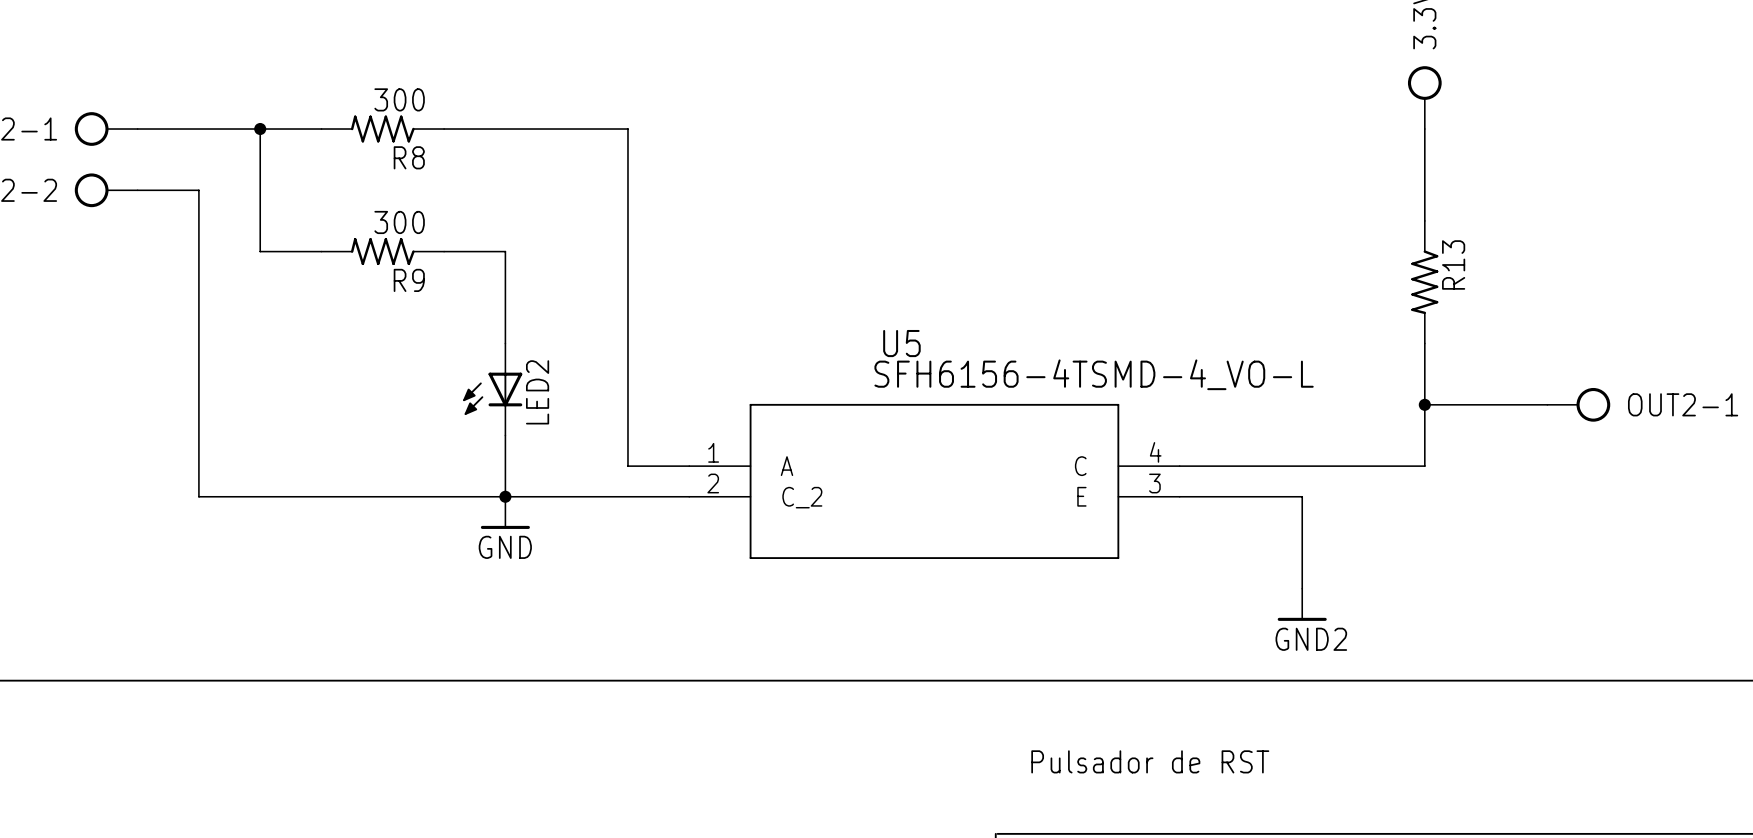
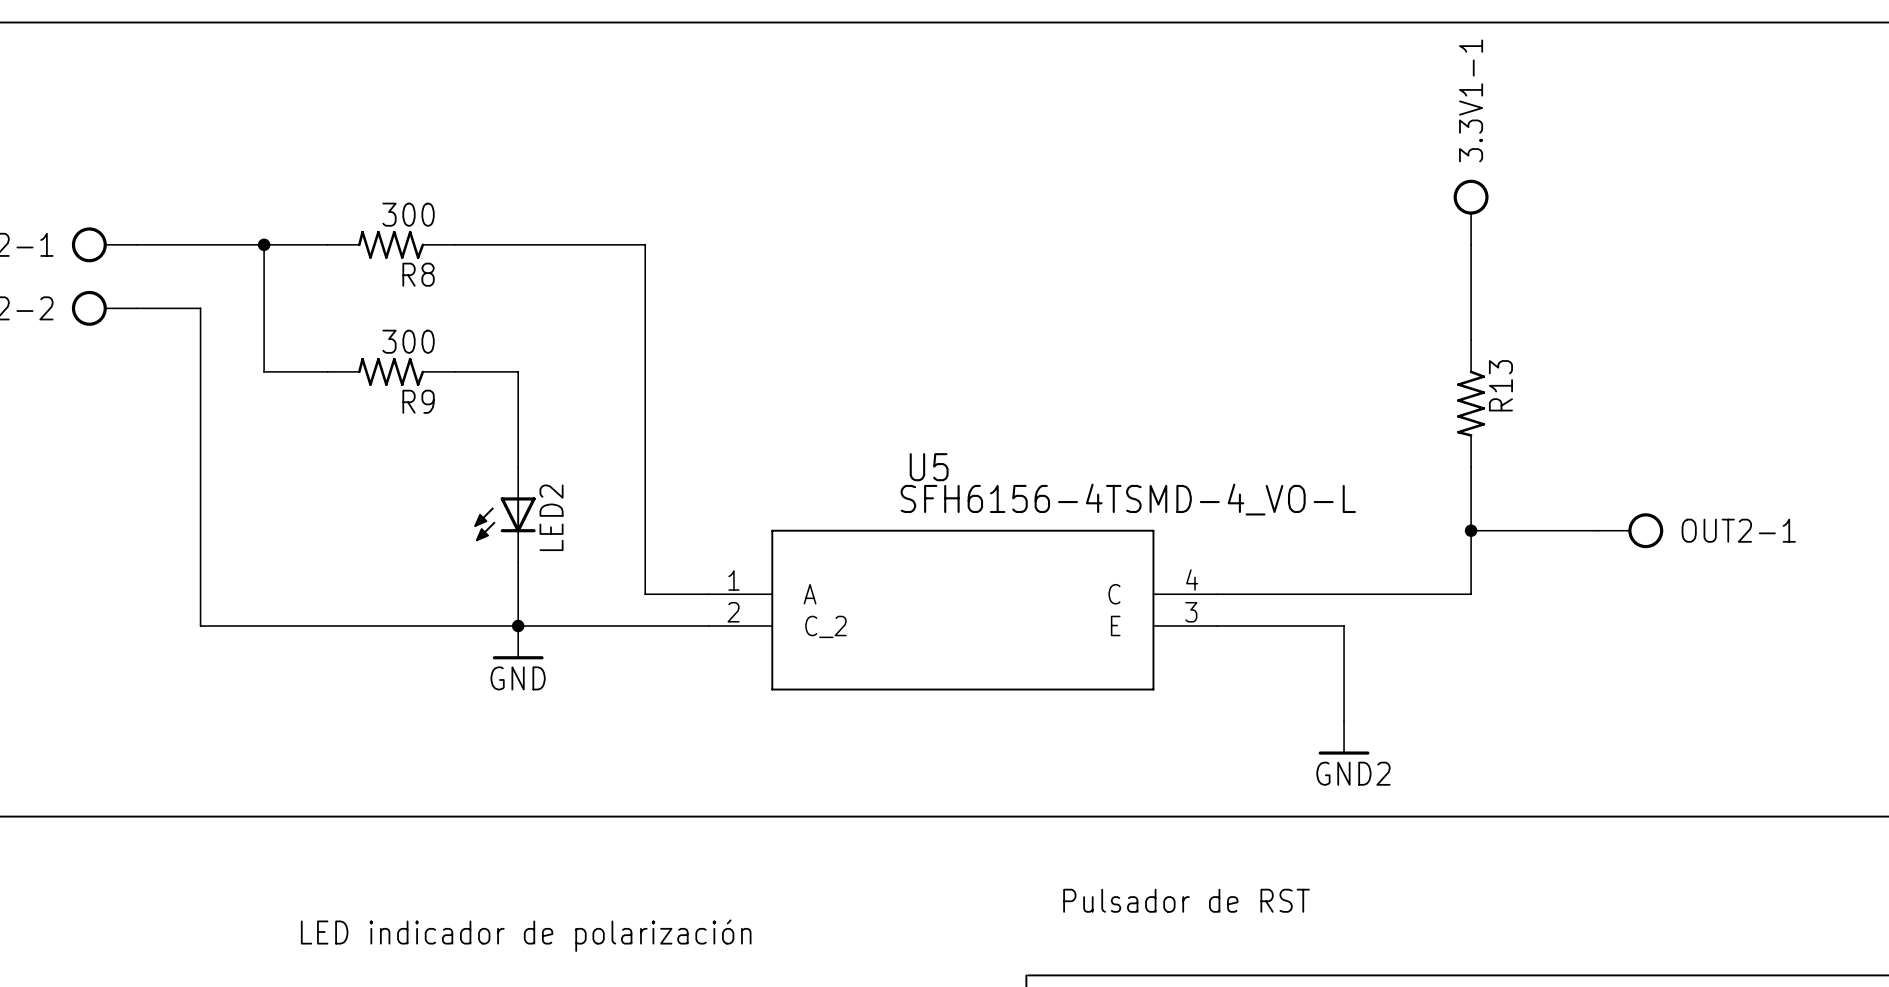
text: none -> LED indicador de polarización (526, 935)

